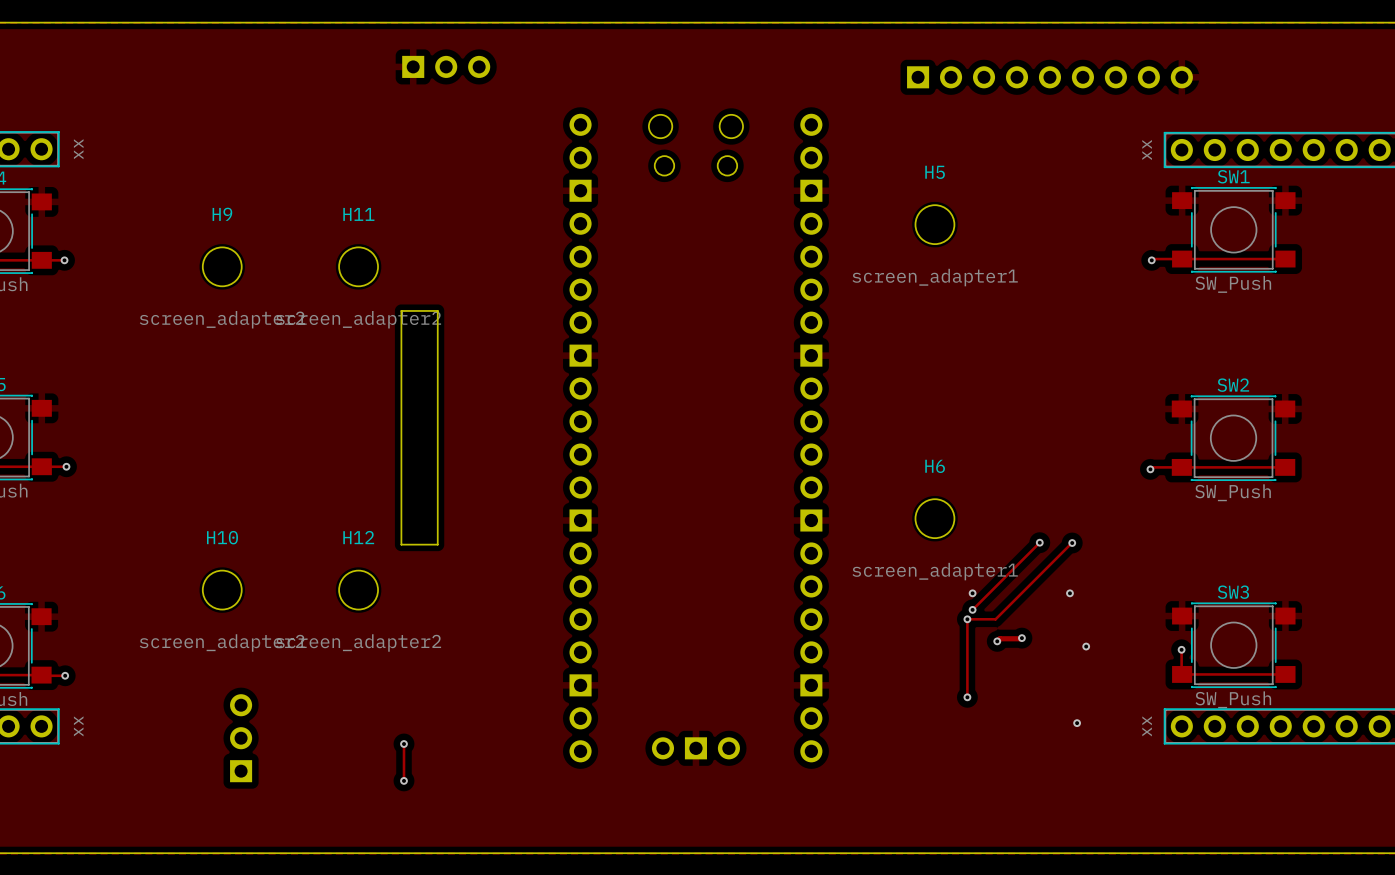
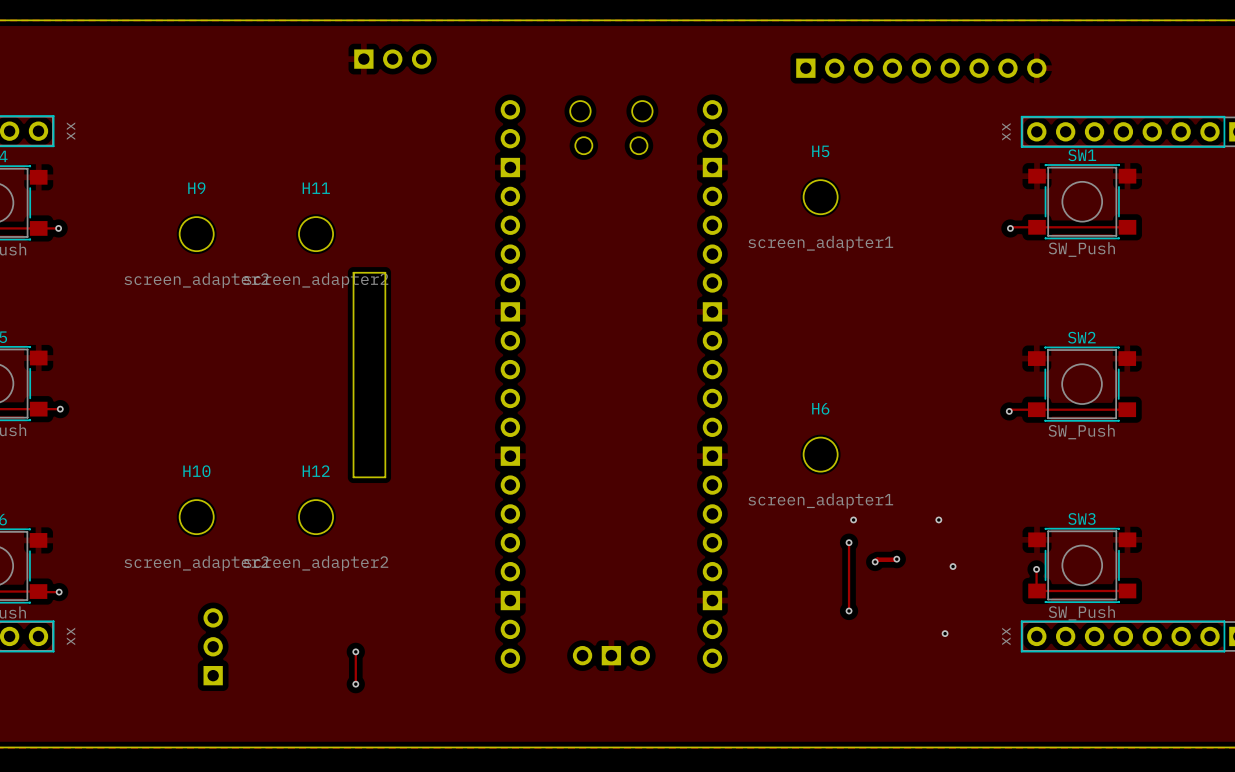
track: (1039, 542) (972, 609) -> none
via: (1039, 542) -> none
track: (1071, 543) (995, 619) (967, 619) -> none
via: (1072, 543) -> none
via: (972, 609) -> none

